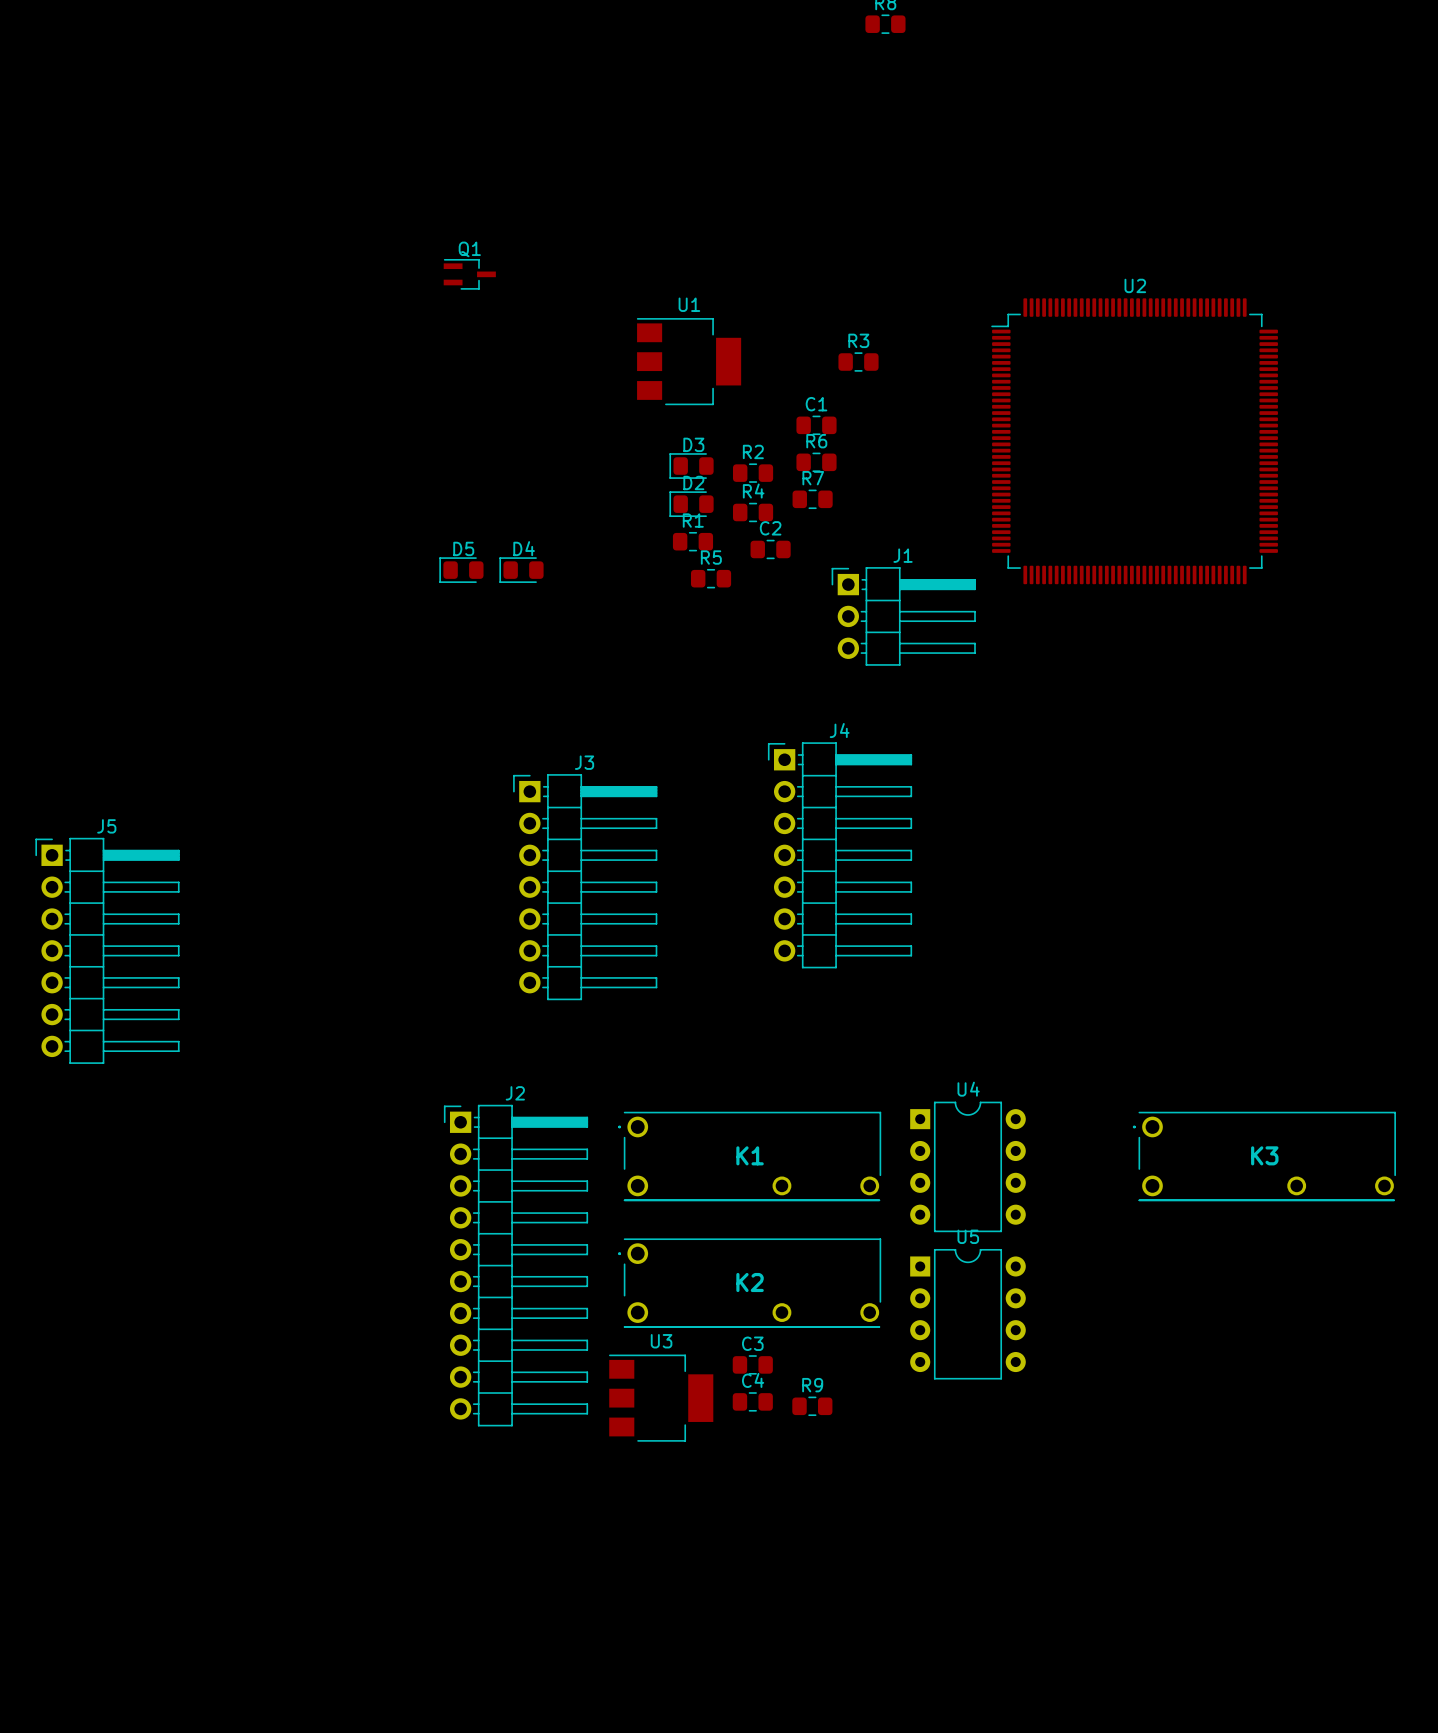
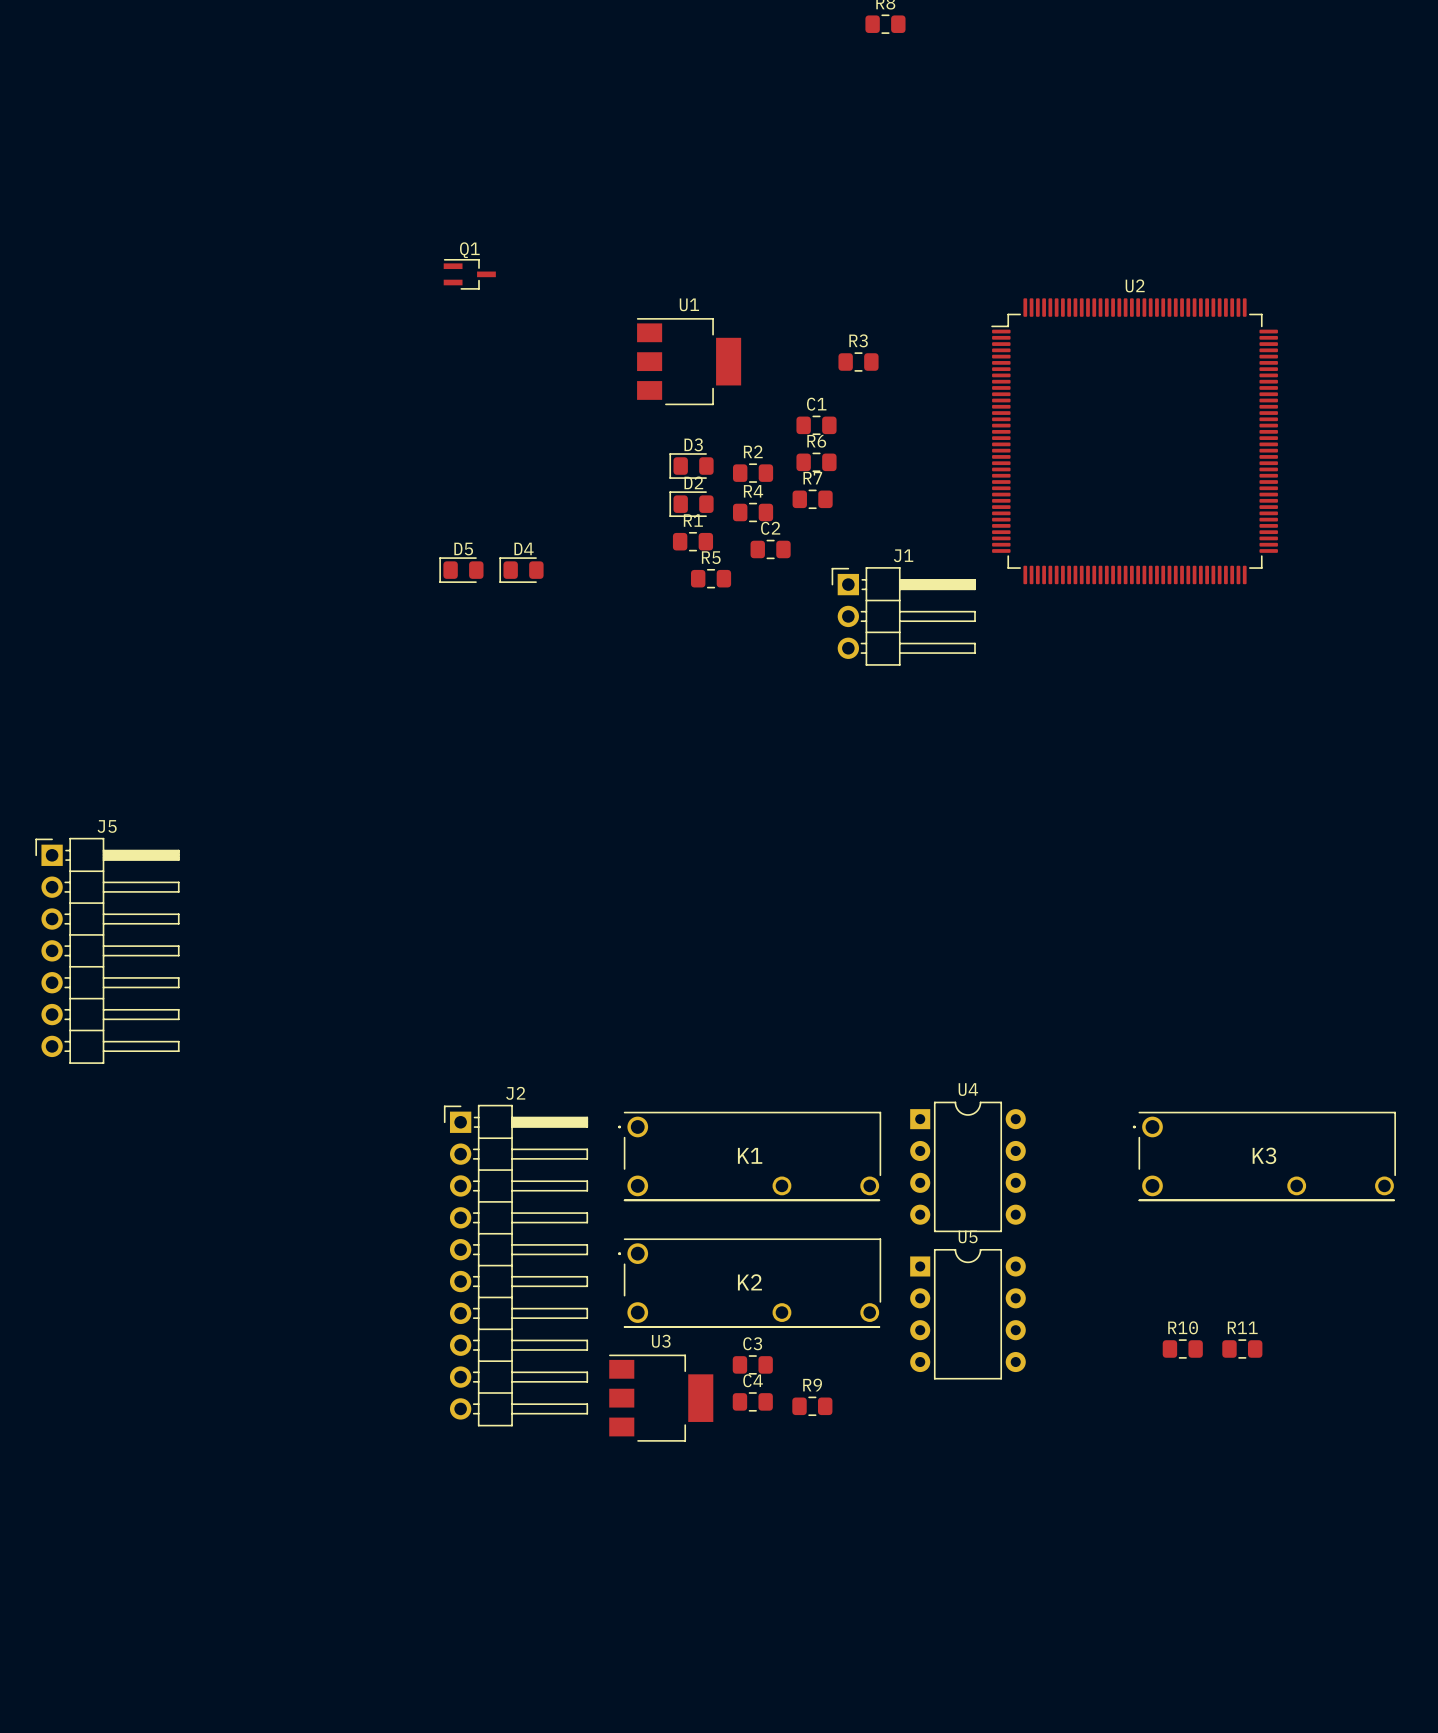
J4: (840, 855) -> none
J3: (585, 887) -> none
R10: none -> (1182, 1348)
R11: none -> (1242, 1348)

